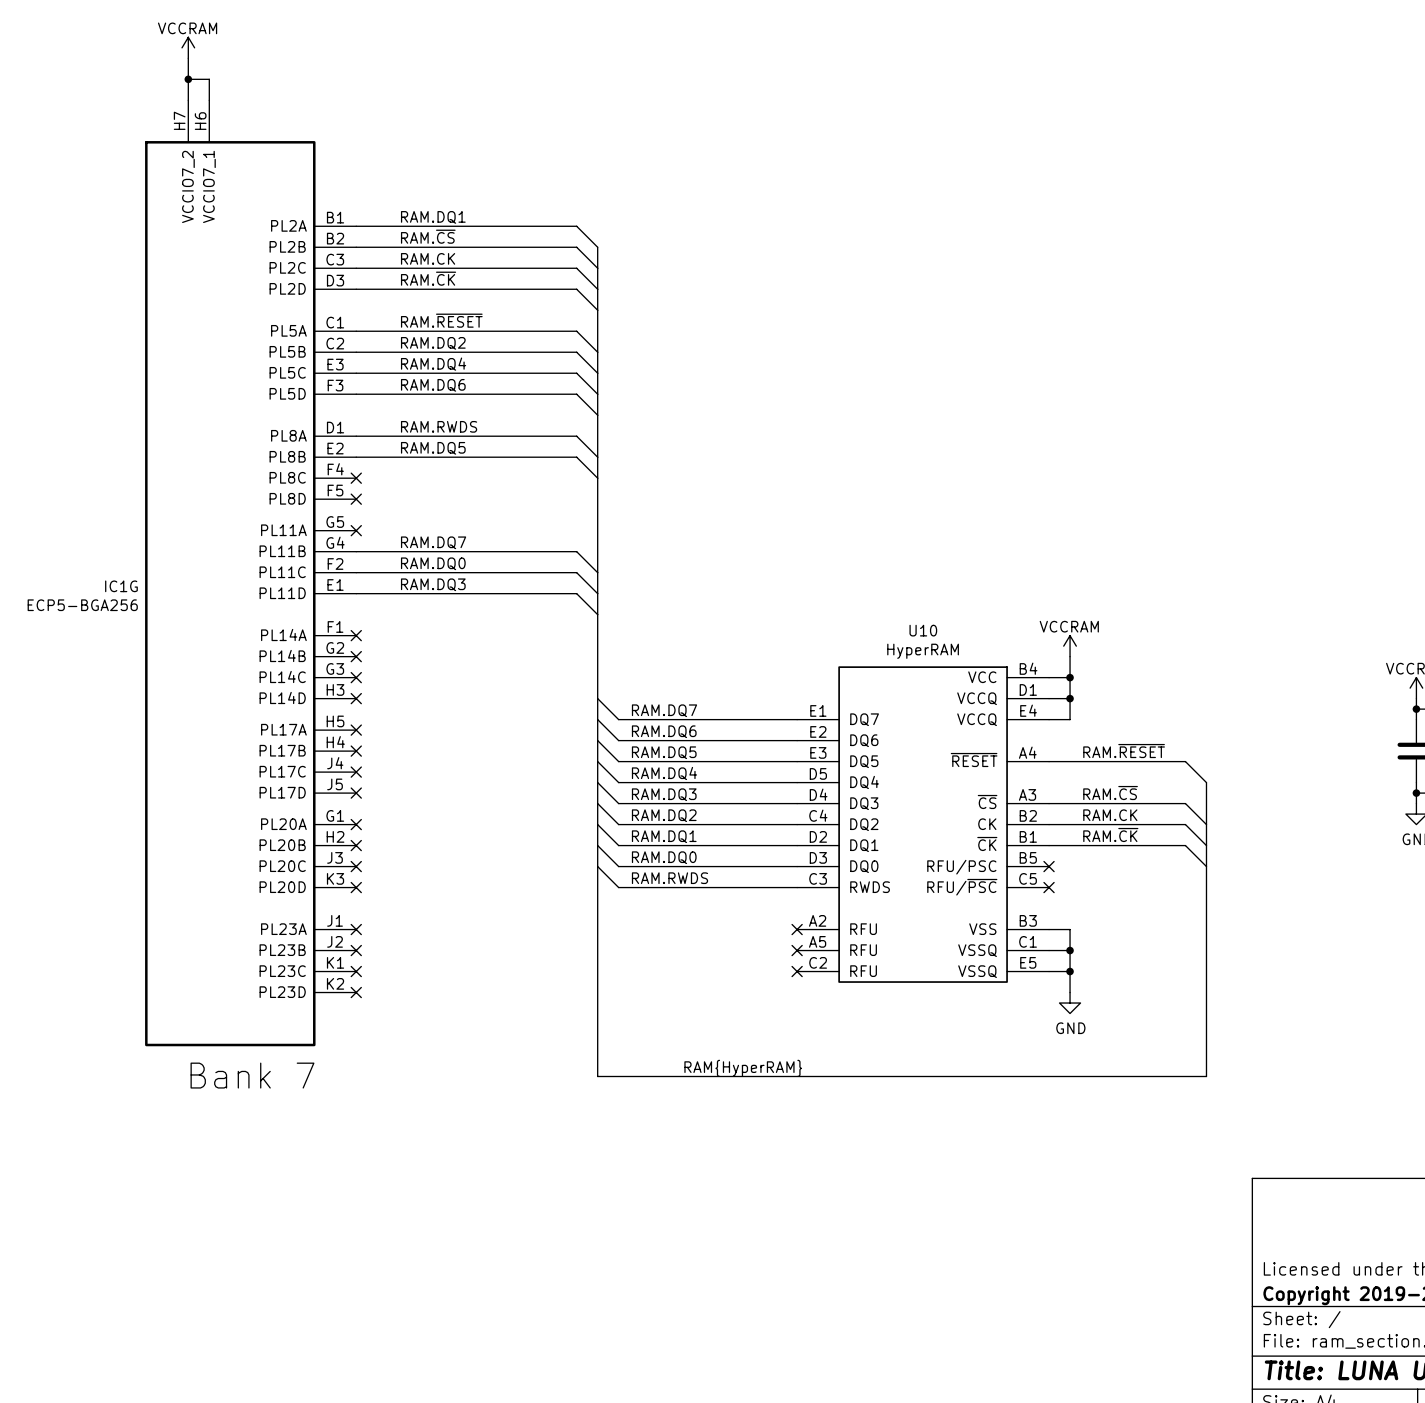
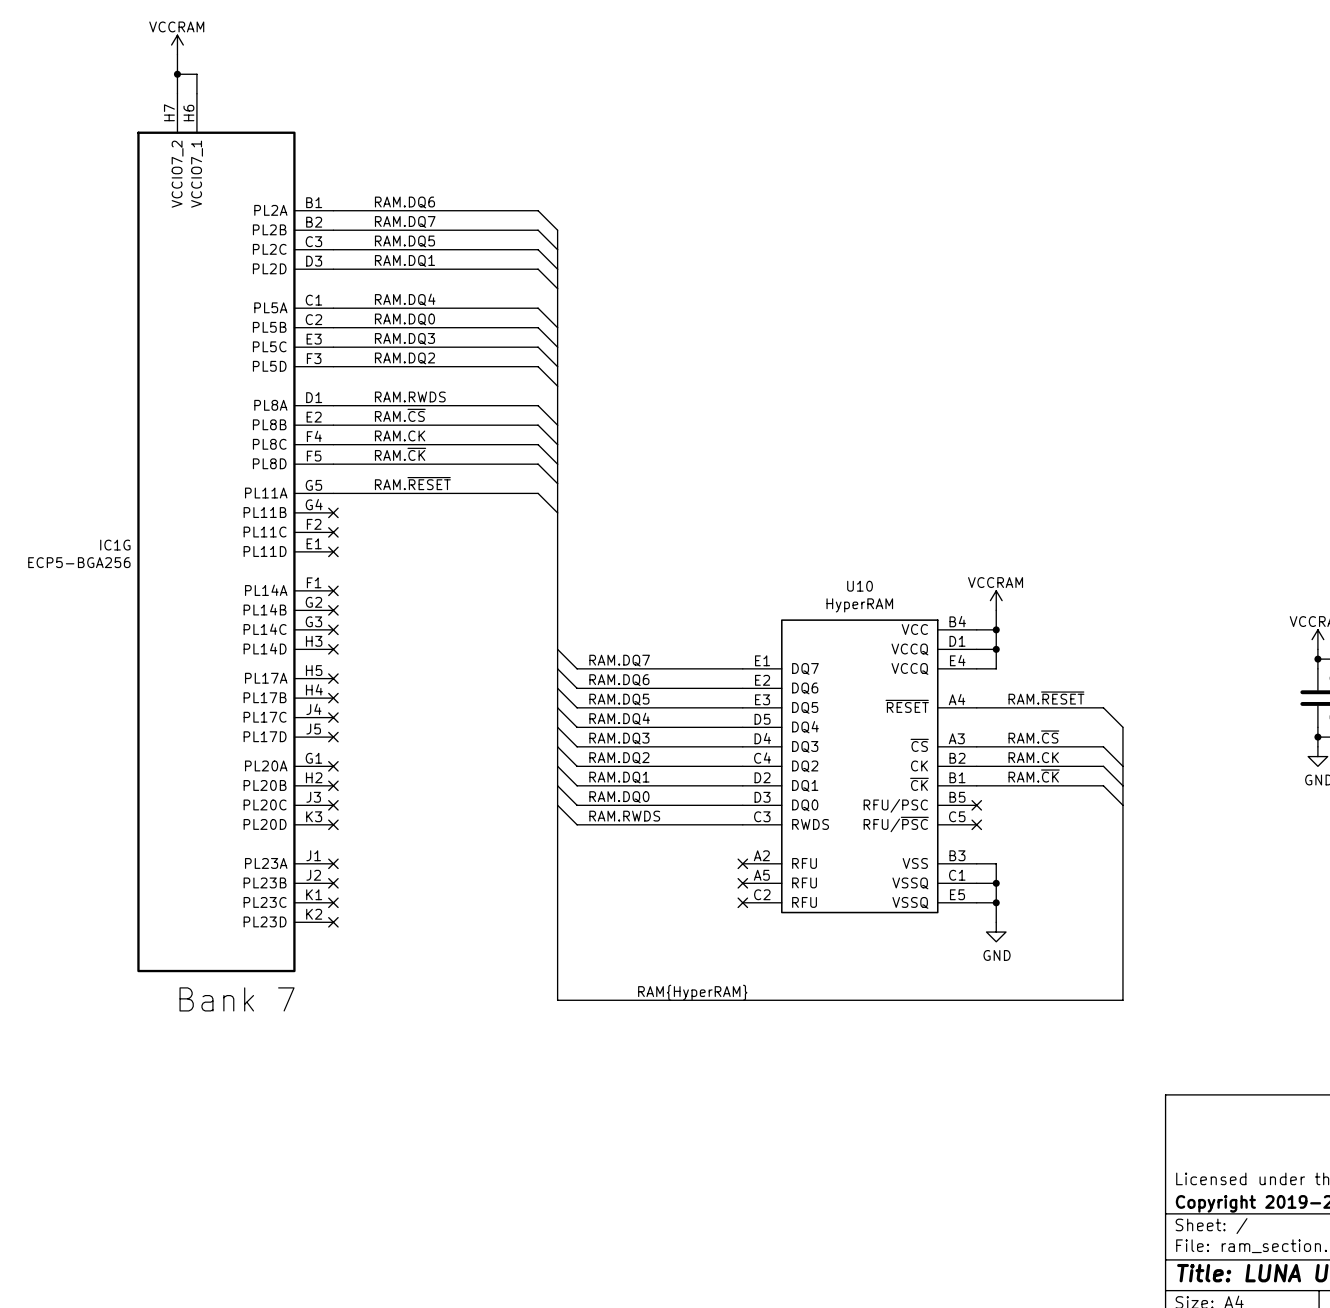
label: RAM.DQ1 (433, 217) -> RAM.DQ6 (404, 202)
label: RAM.~{CS} (428, 236) -> RAM.DQ7 (405, 221)
label: RAM.CK (428, 258) -> RAM.DQ5 (404, 241)
label: RAM.~{CK} (428, 278) -> RAM.DQ1 (404, 260)
label: RAM.~{RESET} (441, 320) -> RAM.DQ4 (405, 299)
label: RAM.DQ2 (433, 343) -> RAM.DQ0 (404, 319)
label: RAM.DQ4 (433, 364) -> RAM.DQ3 (404, 338)
label: RAM.DQ6 (433, 385) -> RAM.DQ2 (404, 358)
label: RAM.DQ5 (433, 448) -> RAM.~{CS} (400, 415)
label: none -> RAM.CK (400, 435)
no-connect mark: (356, 478) -> none
label: none -> RAM.~{CK} (400, 454)
no-connect mark: (356, 499) -> none
label: none -> RAM.~{RESET} (412, 483)
no-connect mark: (356, 530) -> none
label: RAM.DQ7 (433, 542) -> none
wire: (356, 551) (576, 551) (597, 572) -> (333, 444) (538, 444) (557, 464)
no-connect mark: none -> (333, 512)
label: RAM.DQ0 (433, 563) -> none
wire: (356, 572) (576, 572) (597, 593) -> (333, 464) (538, 464) (557, 483)
no-connect mark: none -> (333, 532)
label: RAM.DQ3 (433, 584) -> none
wire: (356, 593) (576, 593) (597, 614) -> (333, 493) (538, 493) (557, 512)
no-connect mark: none -> (333, 551)

